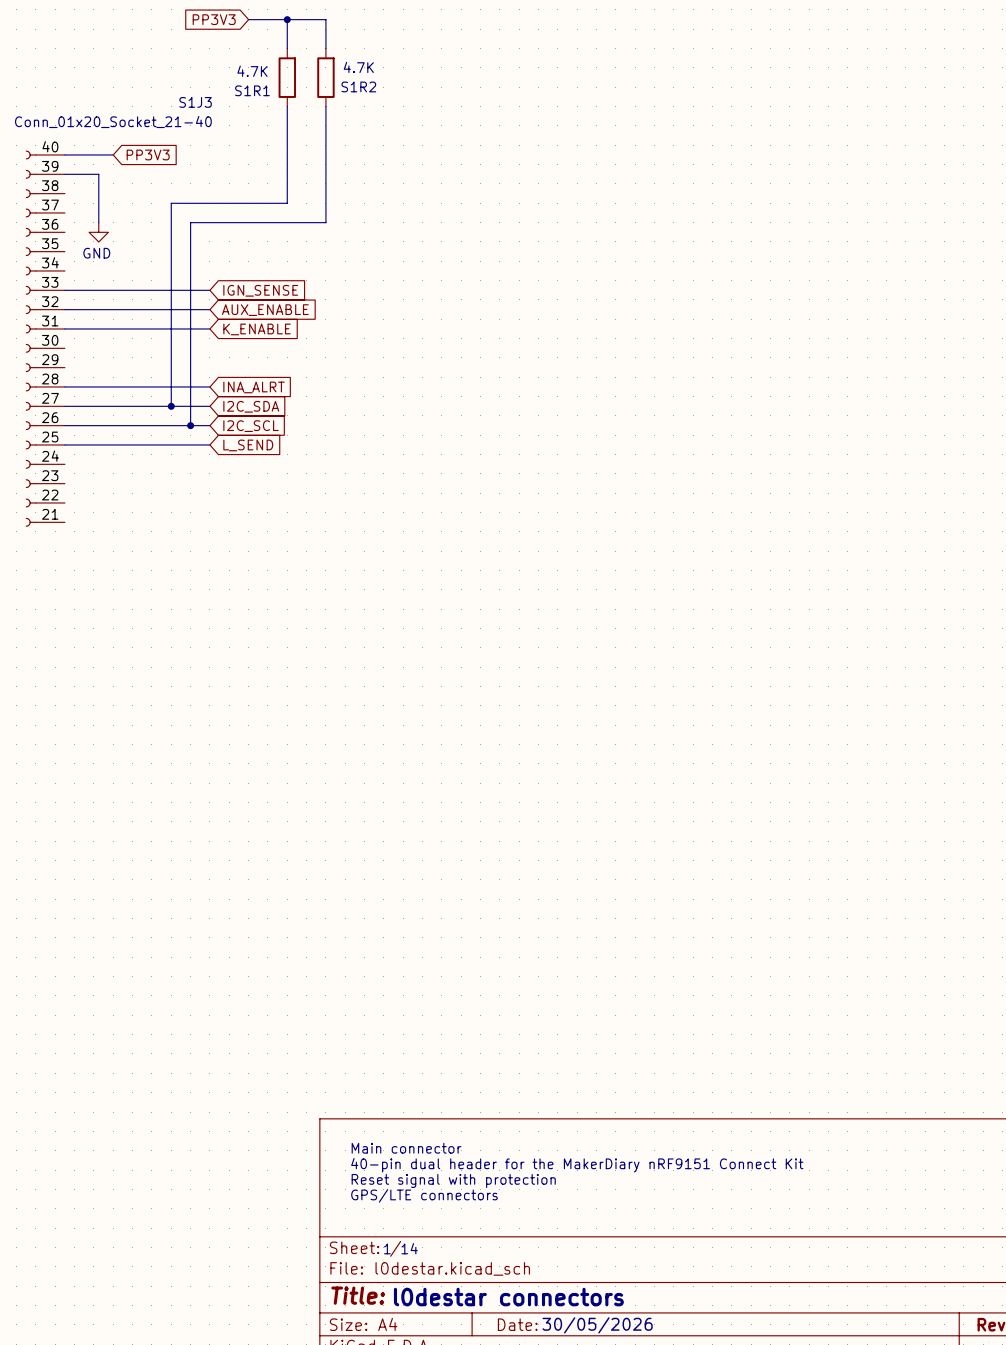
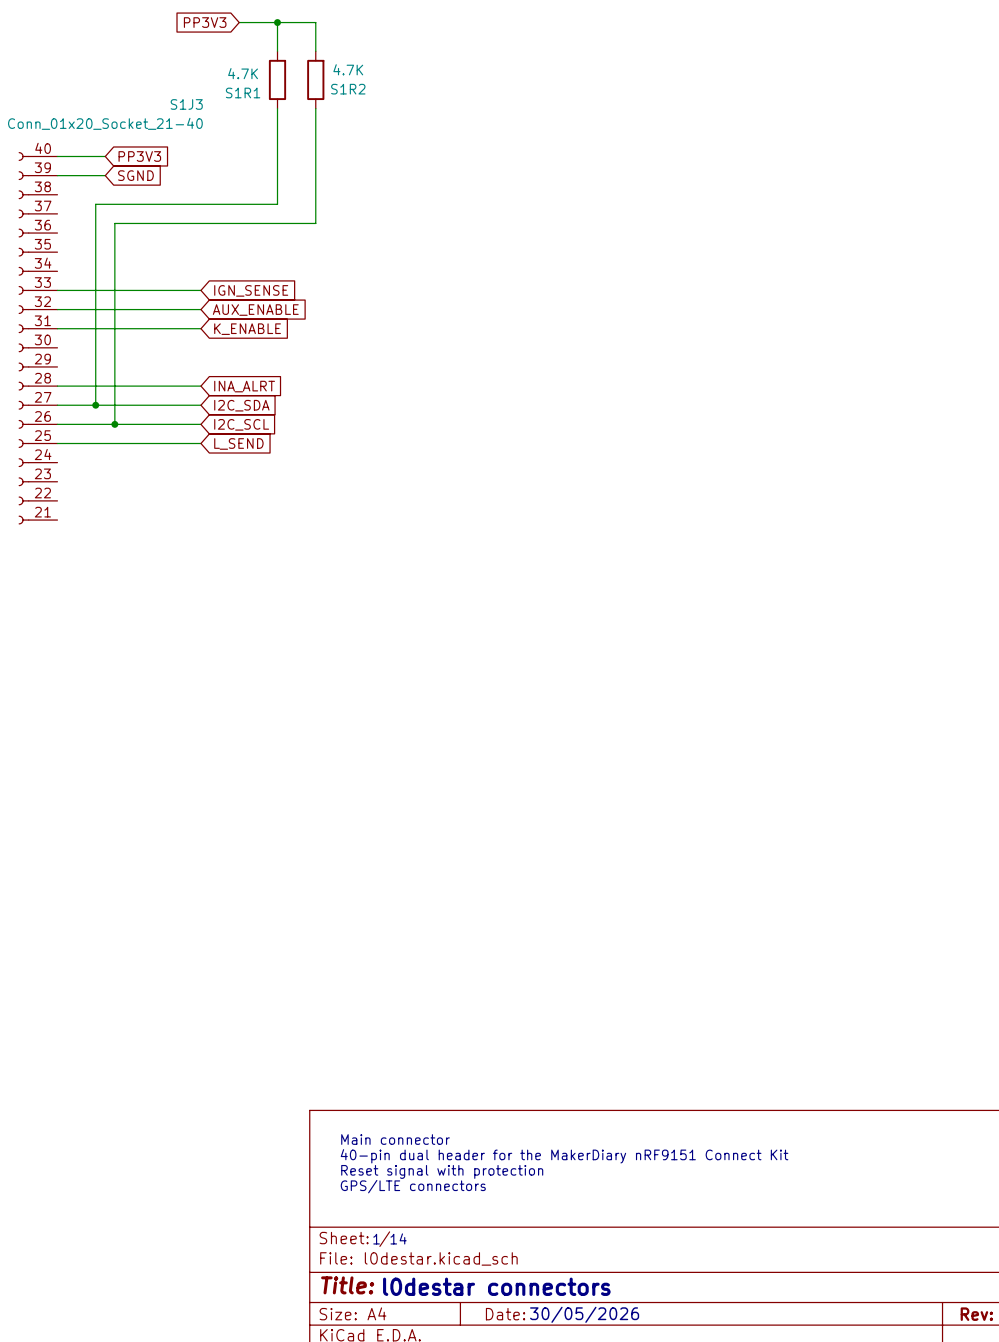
wire: (98, 174) (98, 222) -> (90, 175) (105, 175)
global label: none -> SGND (135, 175)
wire: (171, 203) (171, 406) -> (162, 204) (95, 204) (95, 405)
wire: (190, 222) (190, 425) -> (181, 223) (114, 223) (114, 424)
power symbol: GND (98, 232) -> none
junction: none -> (95, 405)
junction: (171, 406) -> none
junction: none -> (114, 424)
junction: (190, 425) -> none

